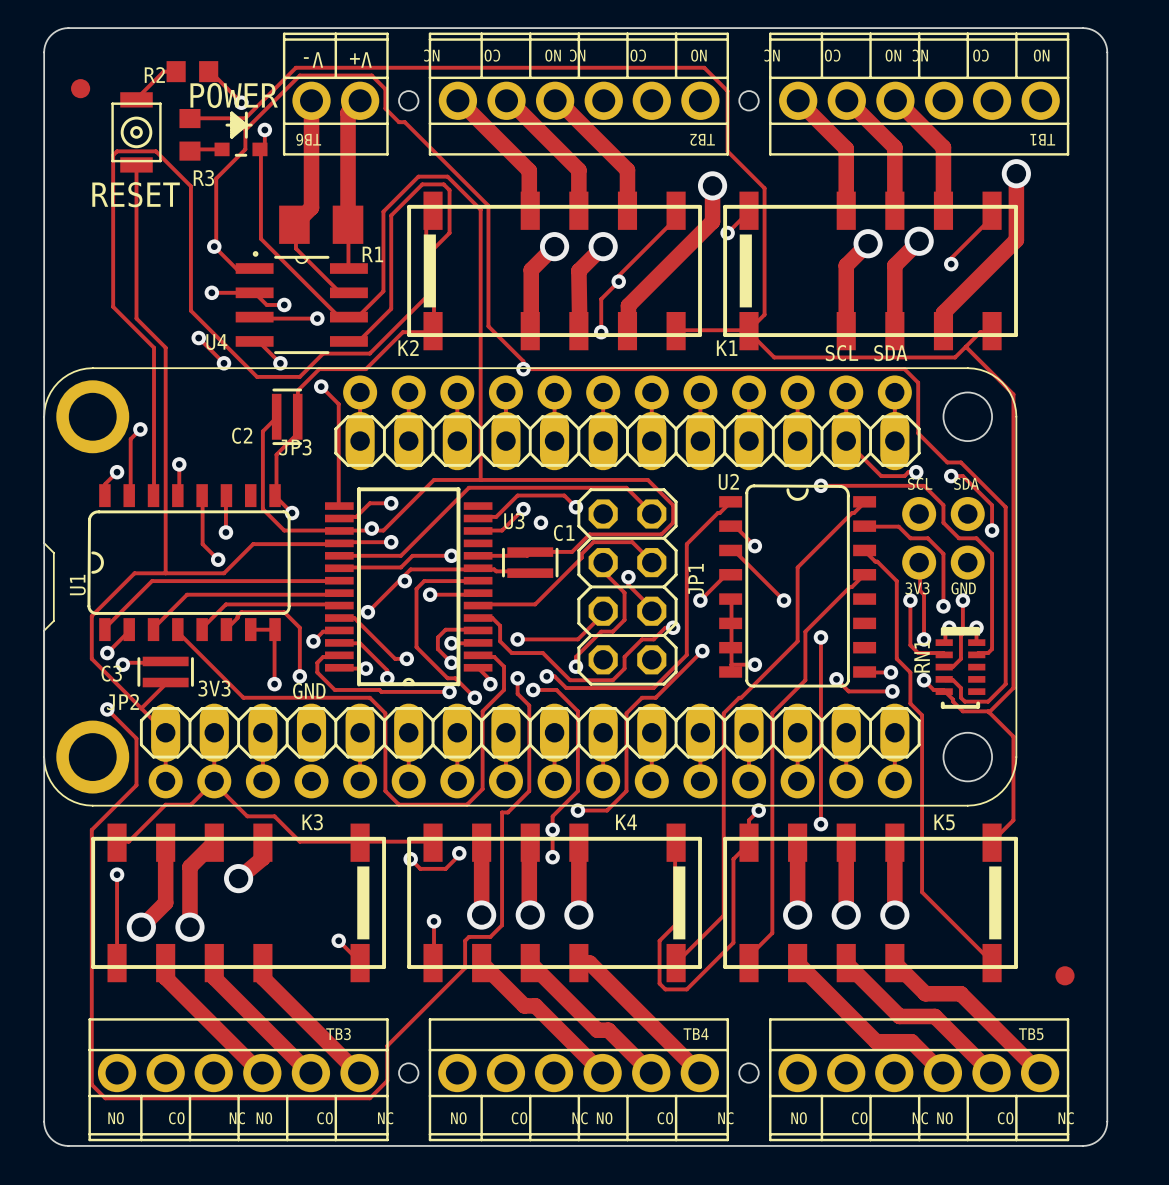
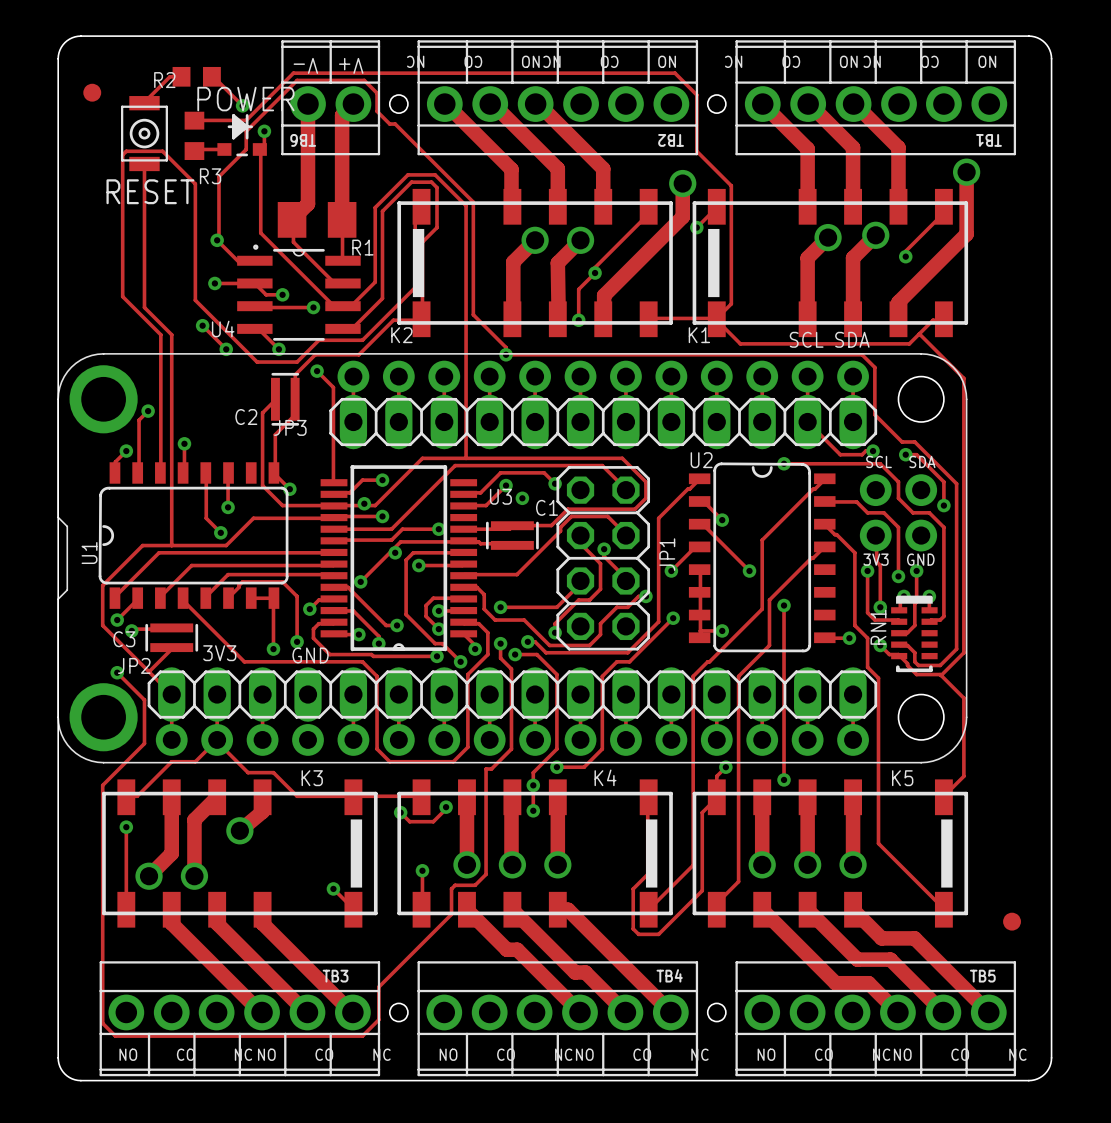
track: (836, 679) (848, 691) (892, 691) -> none
via: (836, 679) -> none
via: (892, 691) -> none

